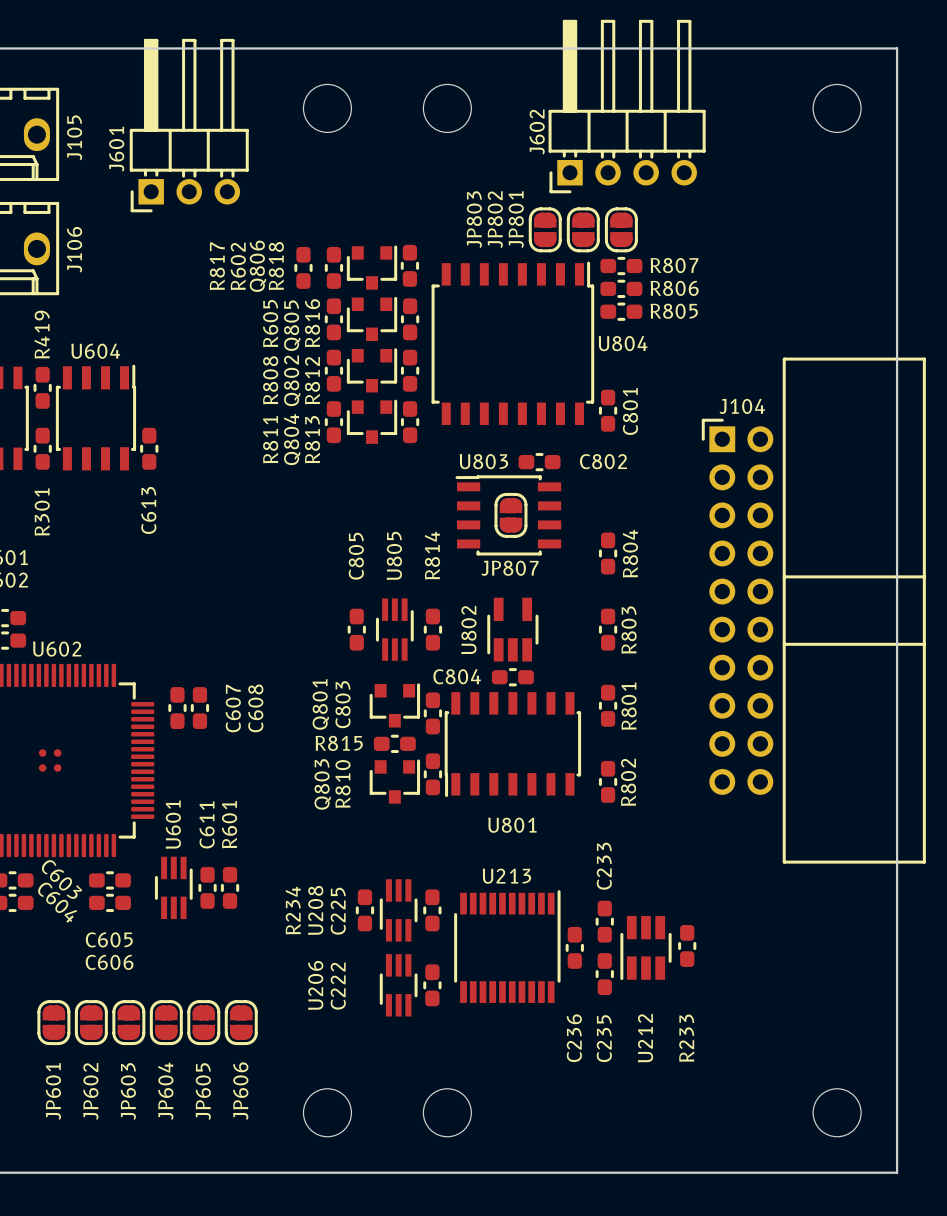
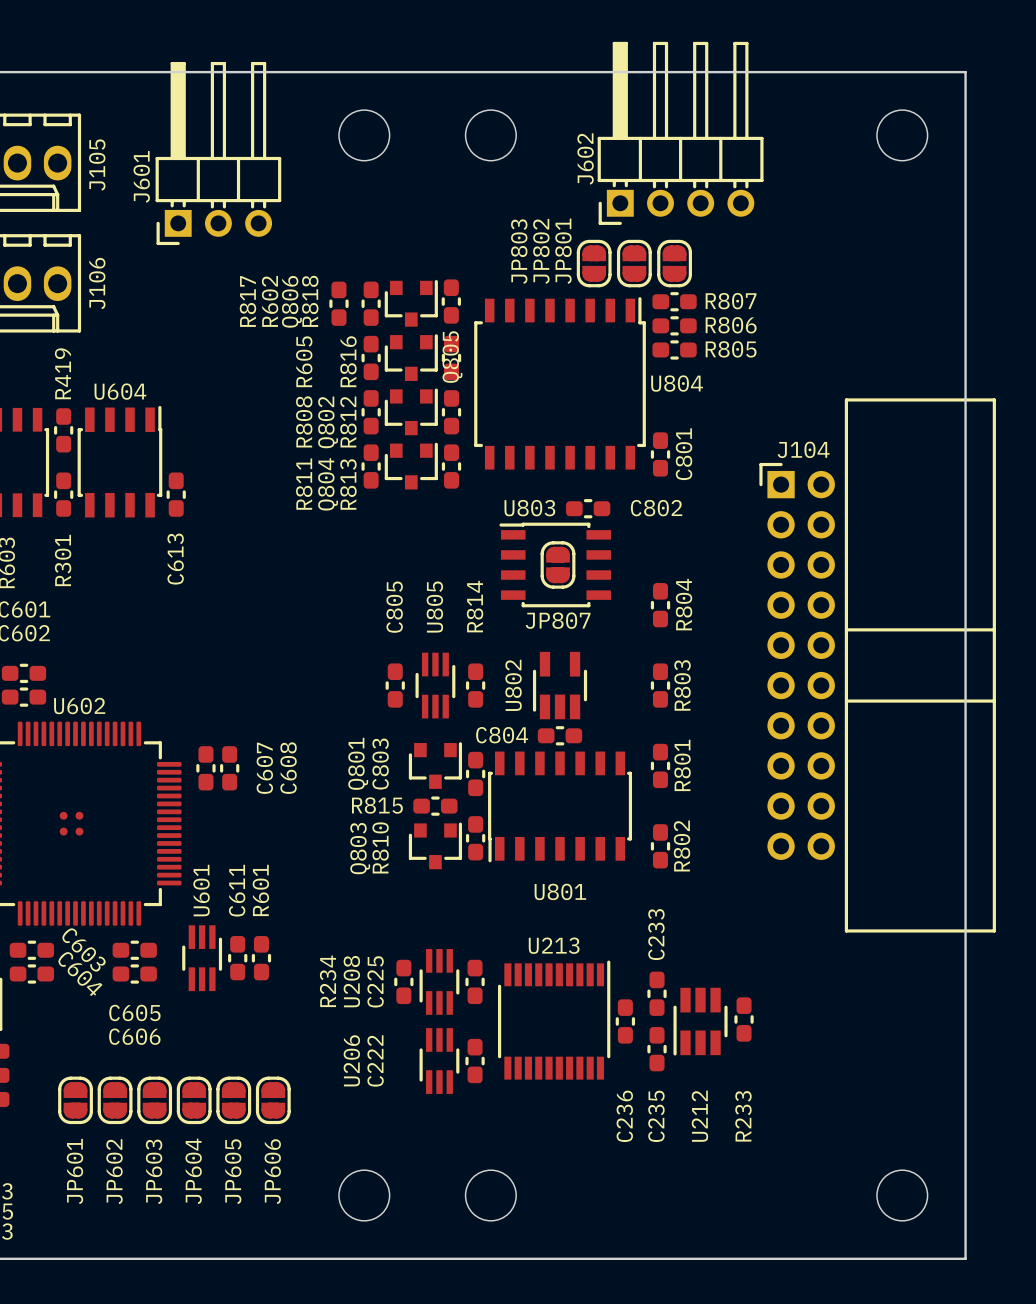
Q805 name position: Q805 (292, 325) -> Q805 (452, 357)

